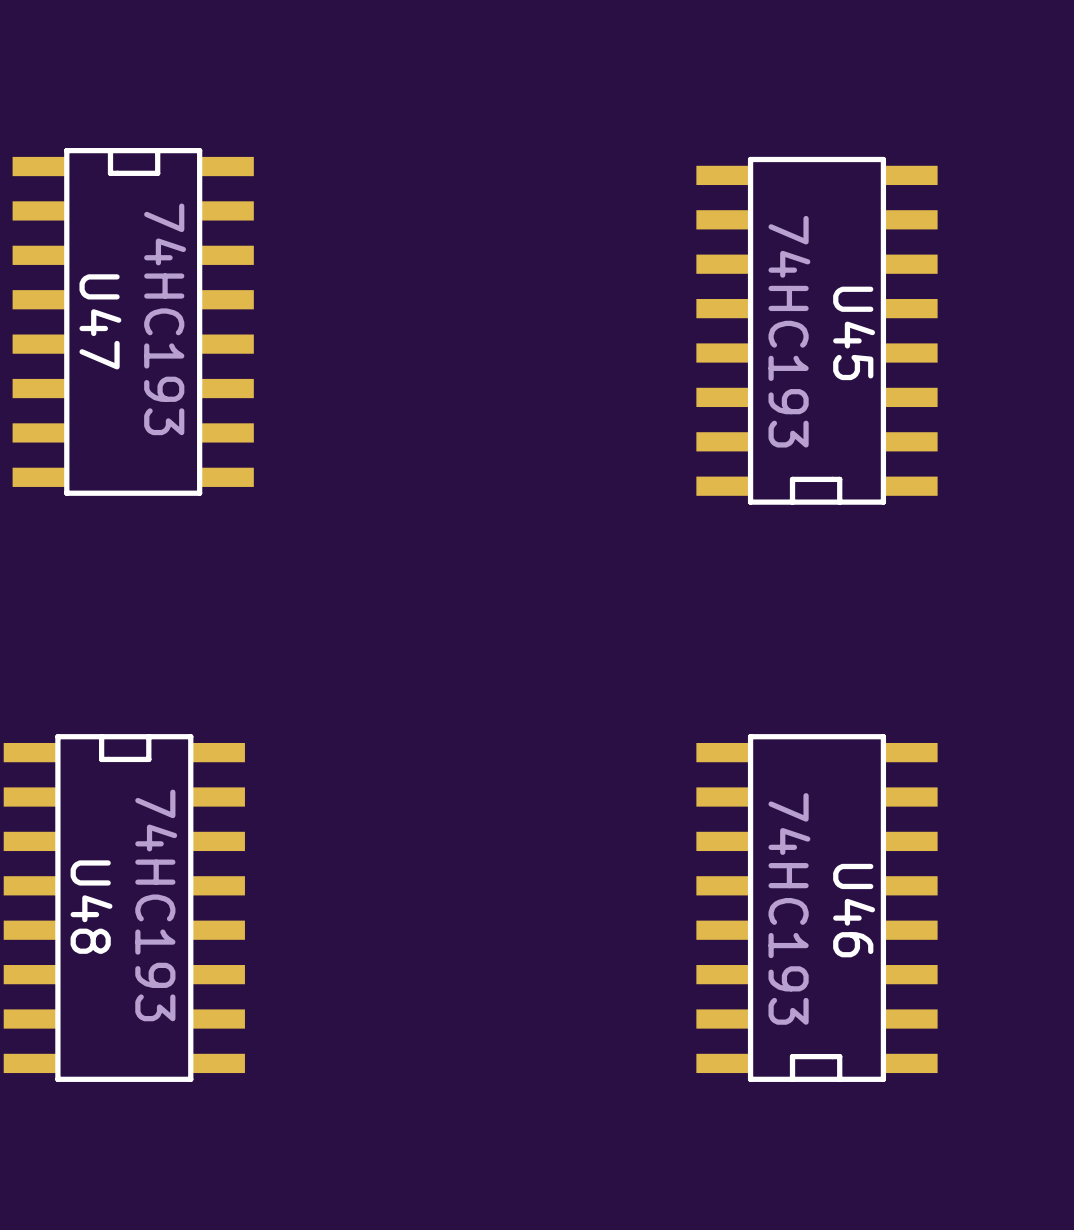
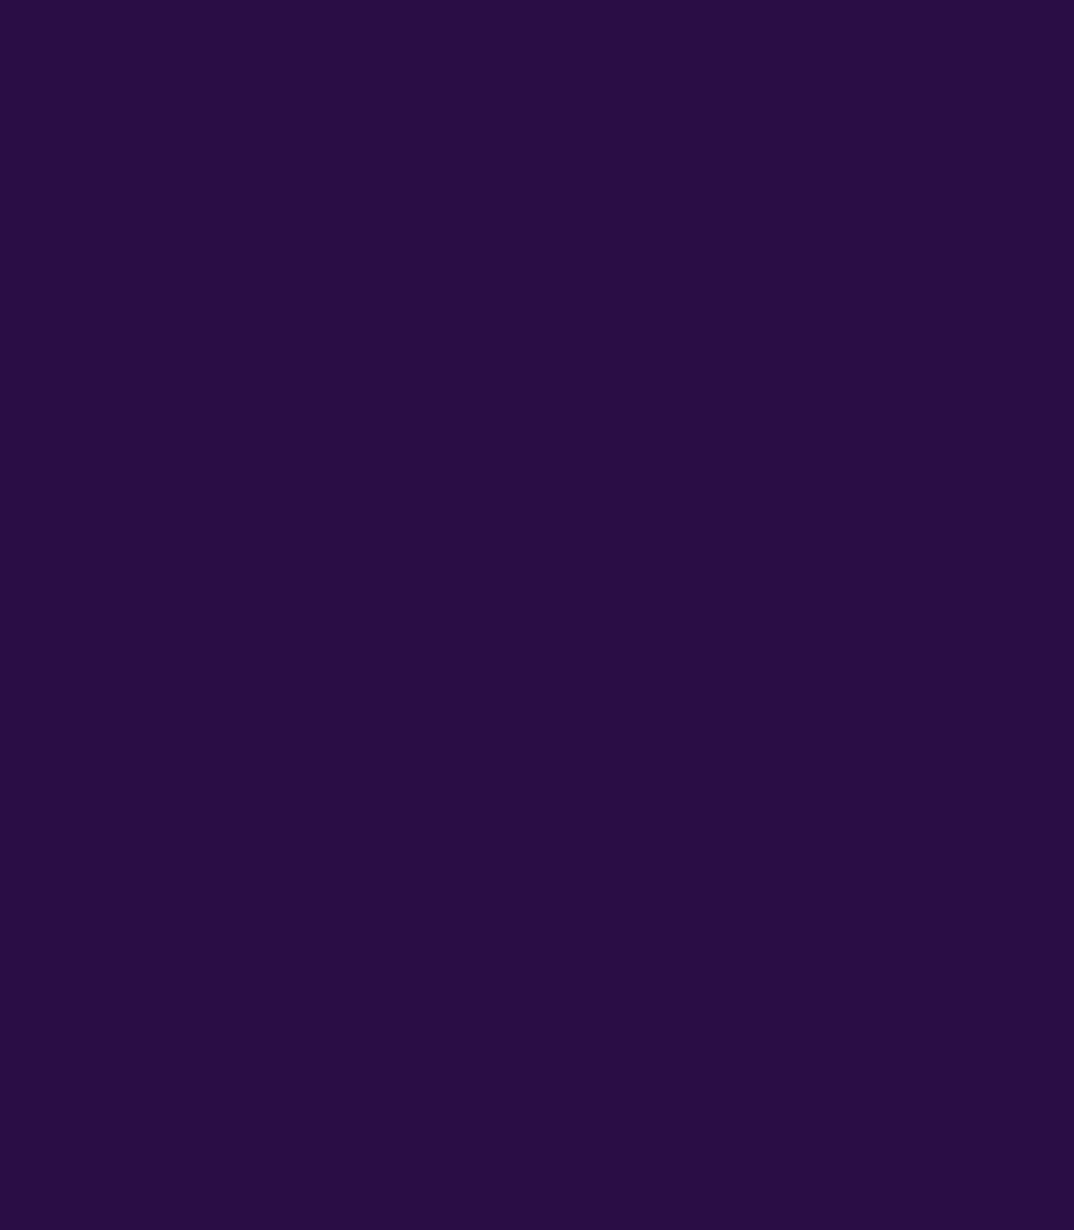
U47: 74HC193 (133, 321) -> none
U45: 74HC193 (816, 330) -> none
U48: 74HC193 (124, 908) -> none
U46: 74HC193 (816, 908) -> none

